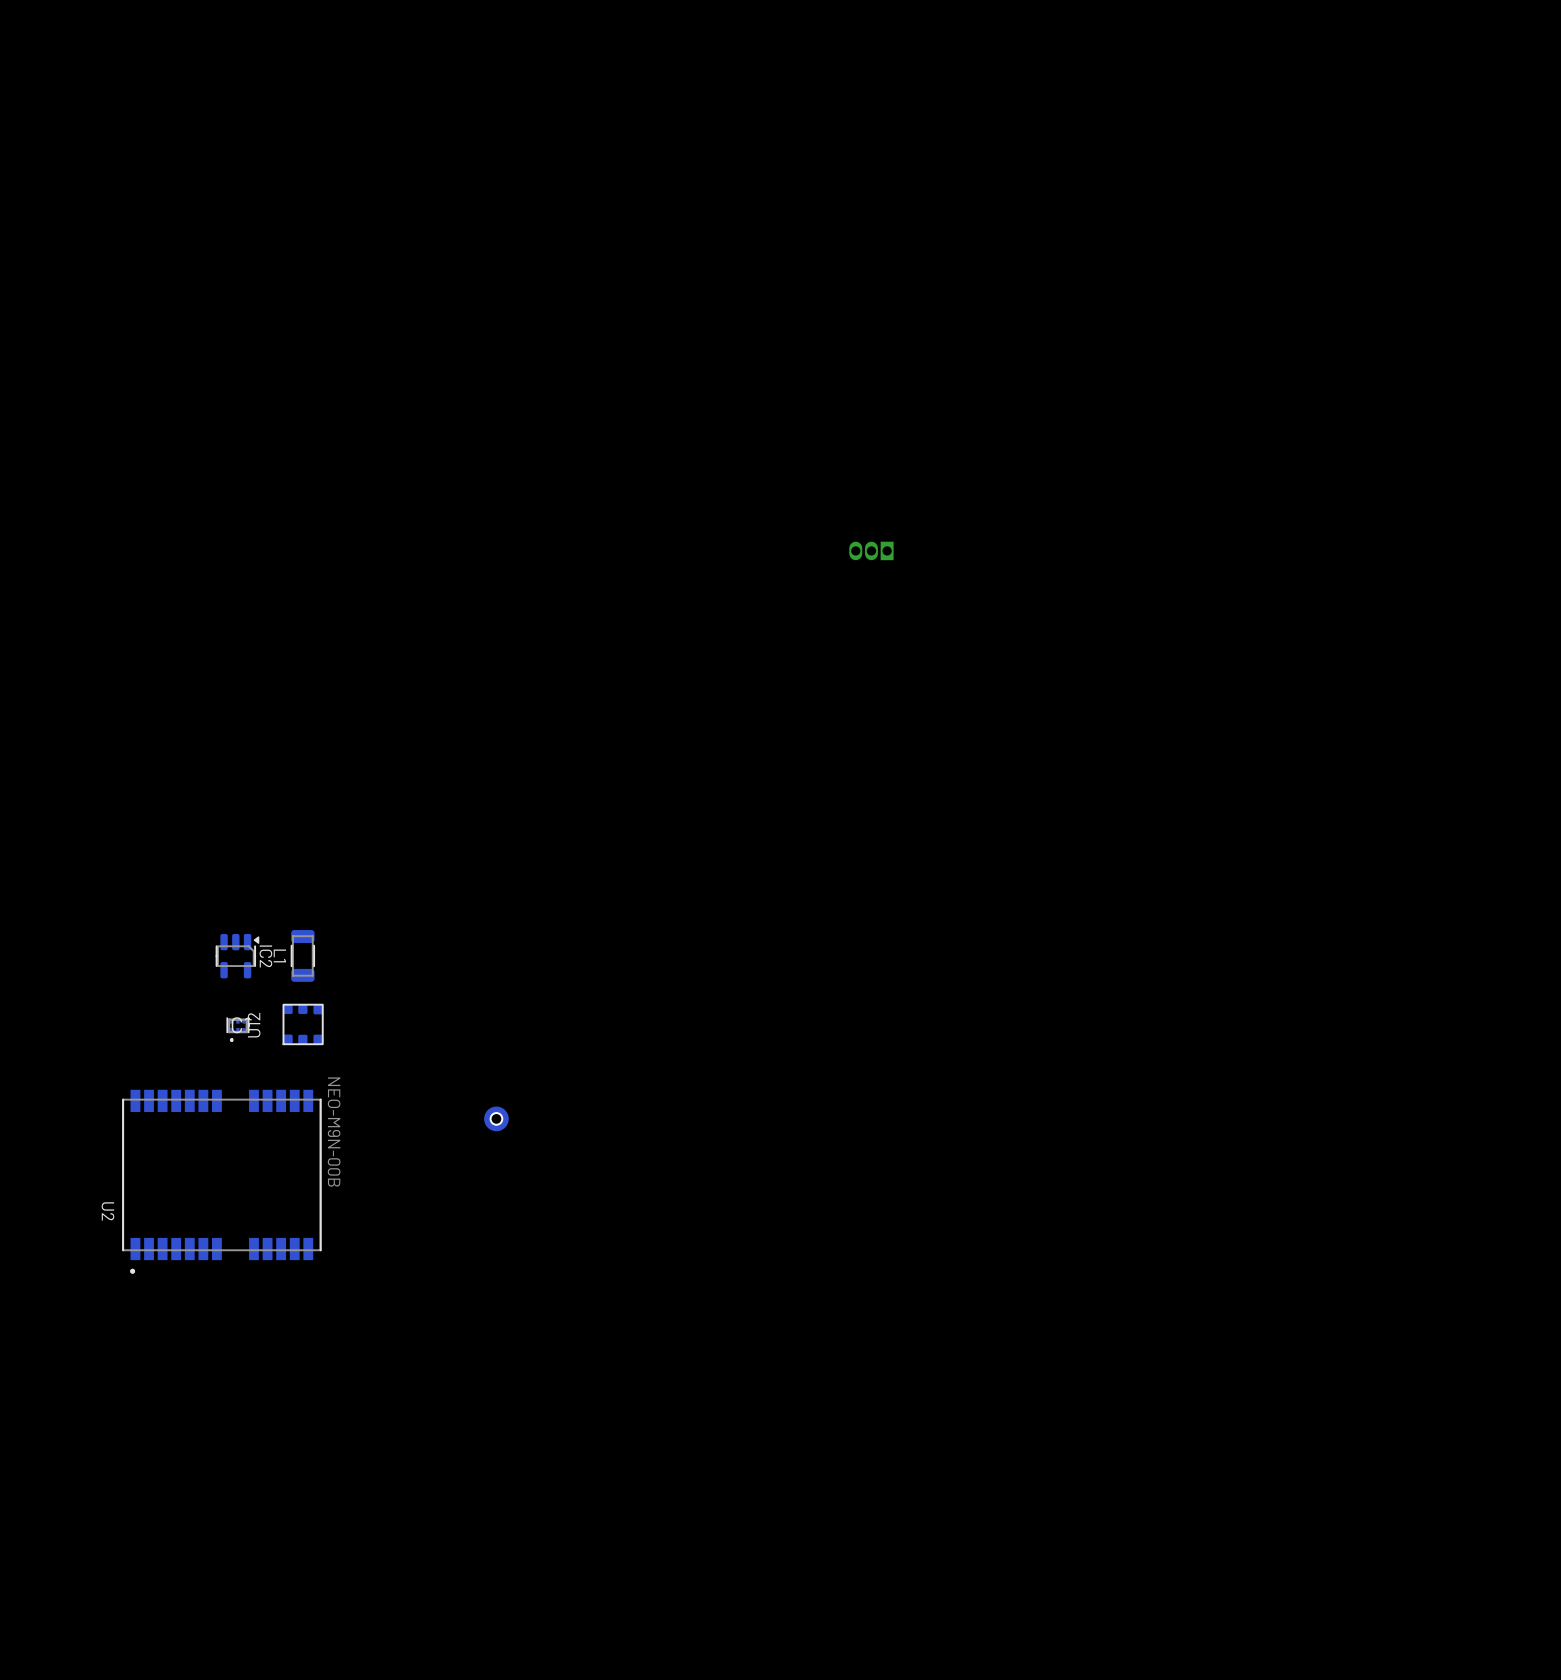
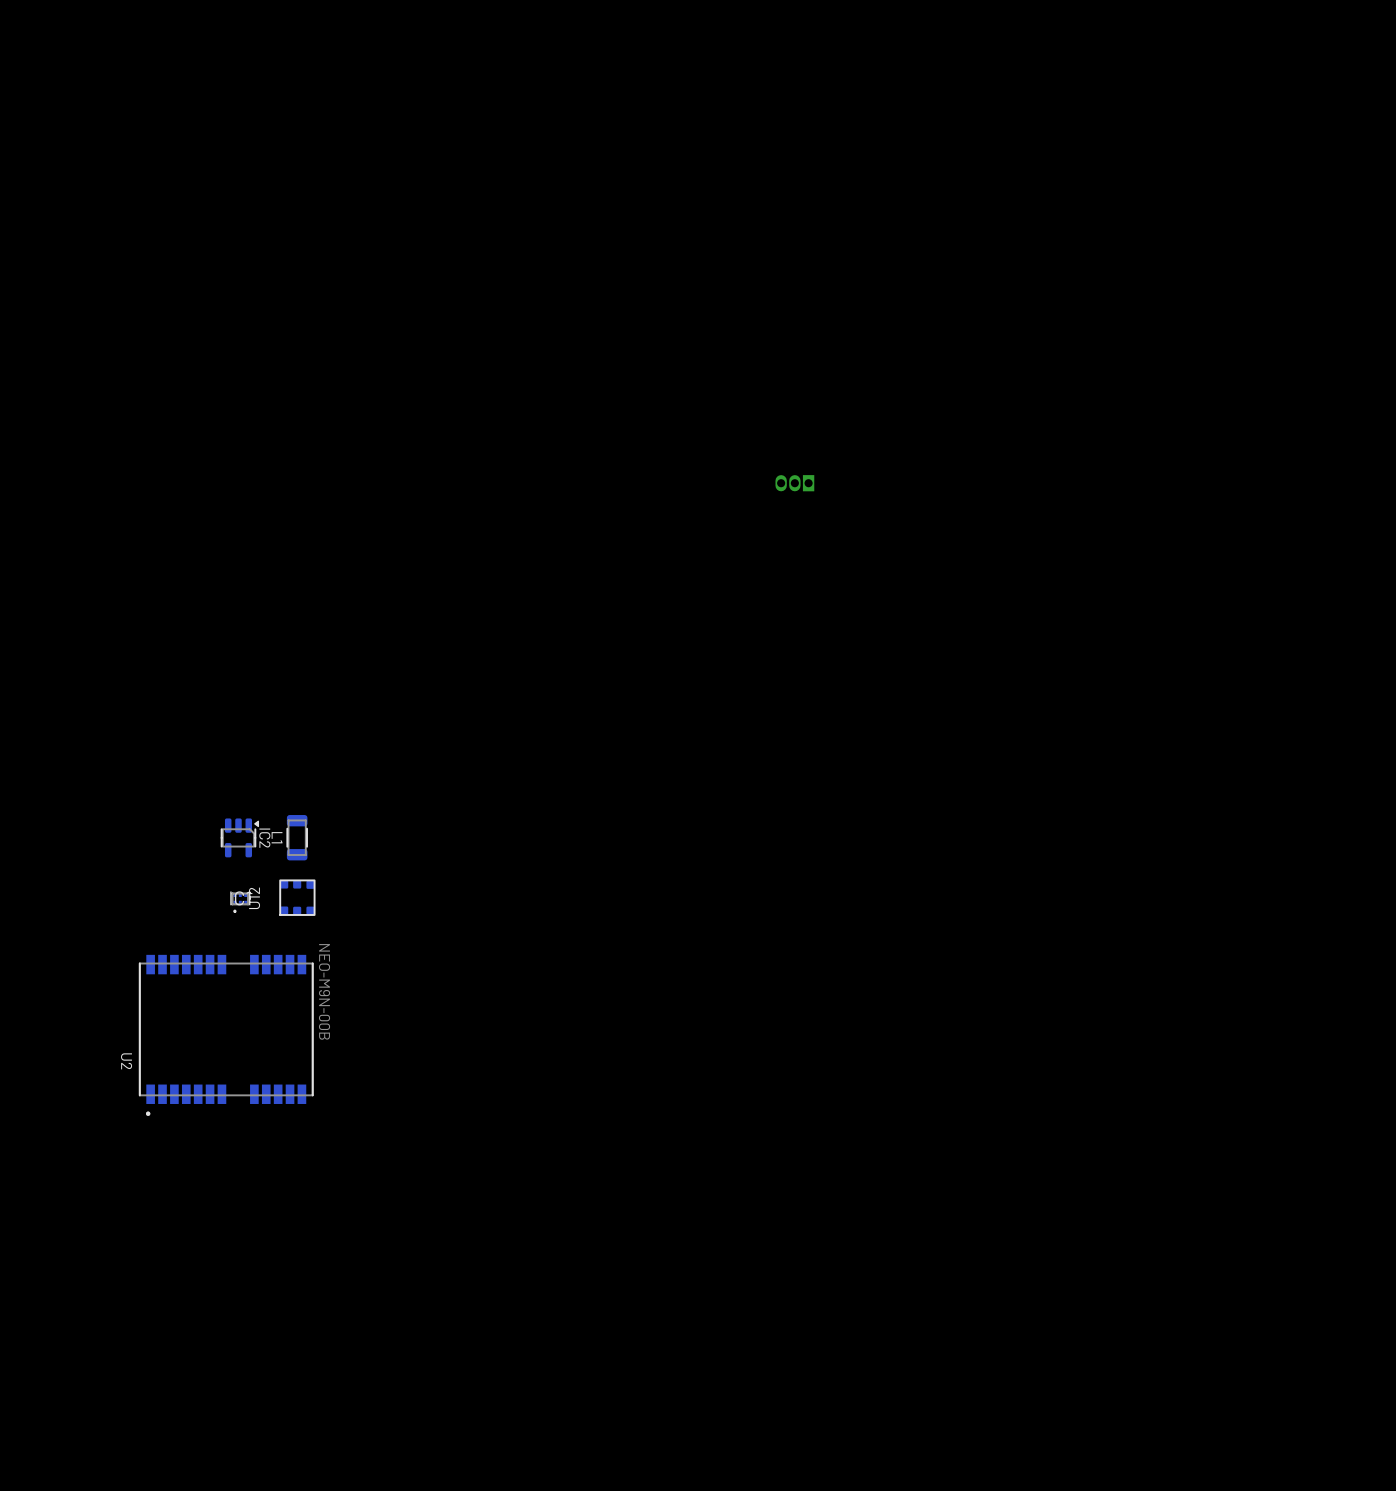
part: (496, 1118) -> none

